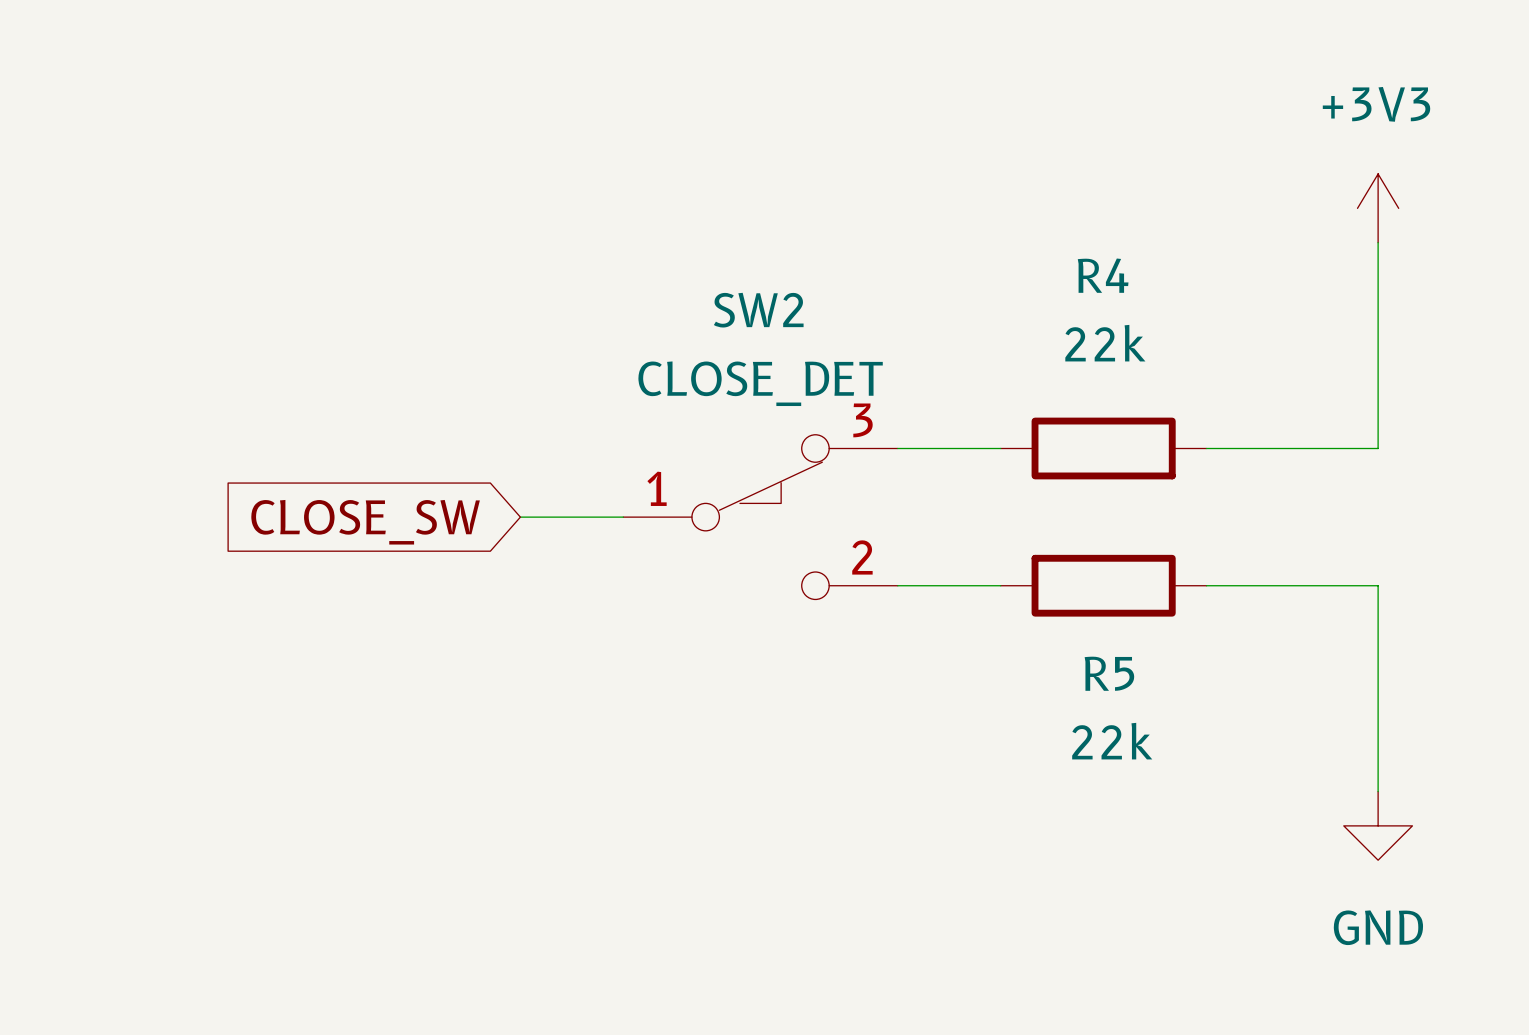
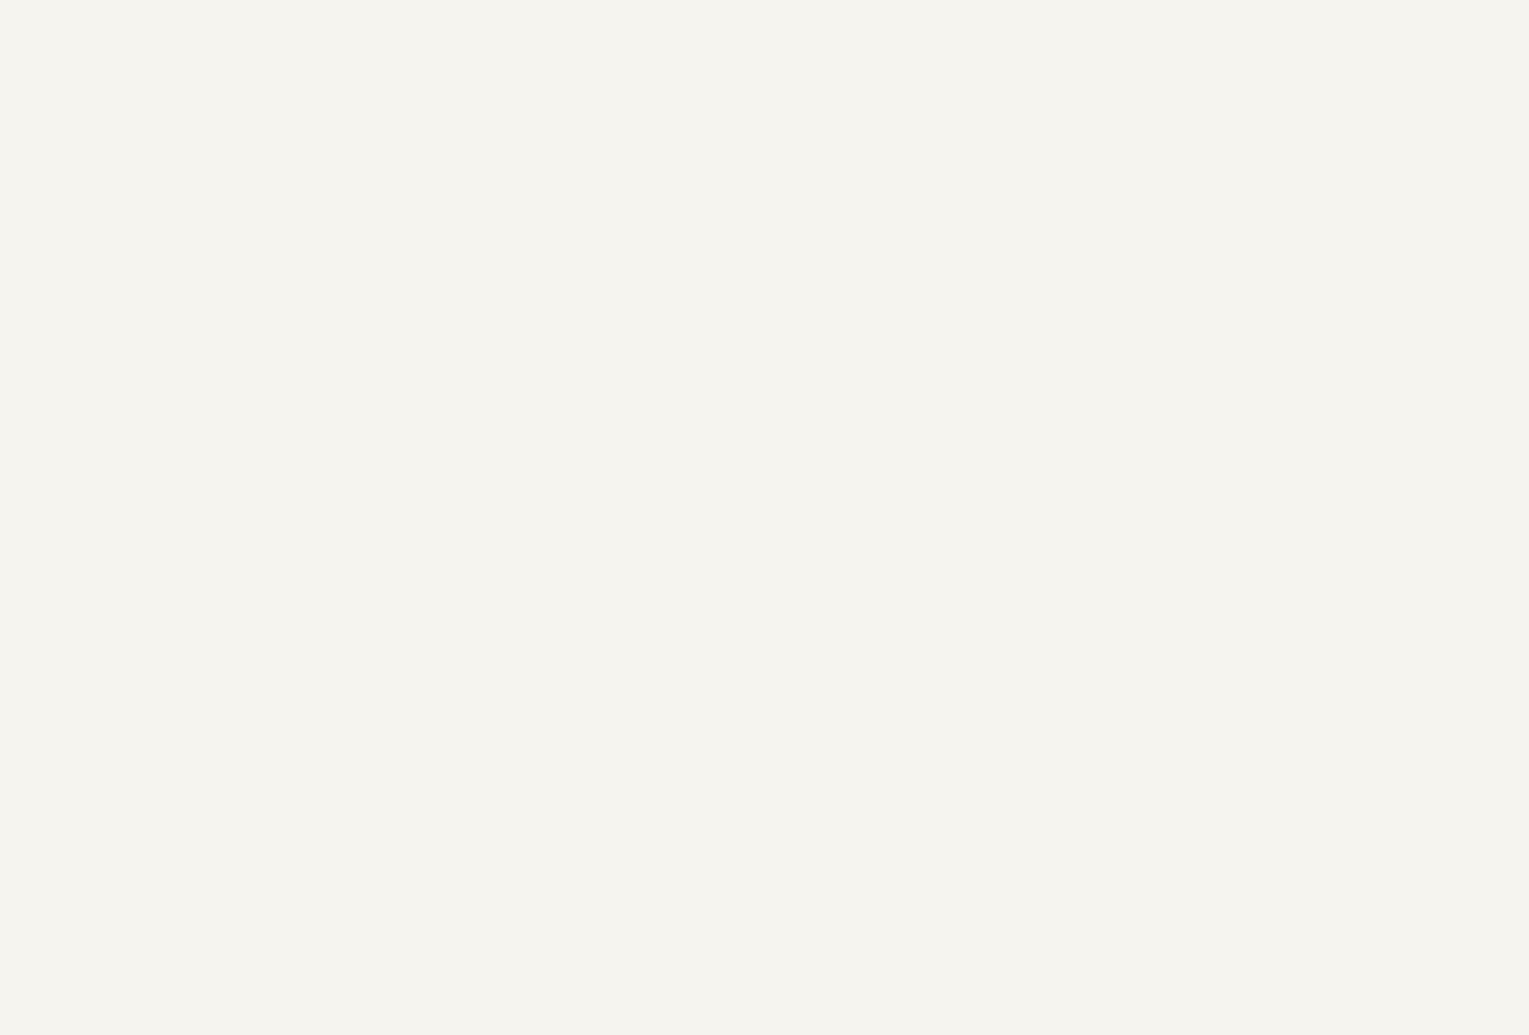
power symbol: +3V3 (1378, 208) -> none
wire: (1378, 242) (1378, 448) (1206, 448) -> none
wire: (897, 448) (1000, 448) -> none
R4: 22k (1103, 448) -> none
wire: (520, 517) (623, 517) -> none
SW2: CLOSE_DET (760, 517) -> none
global label: CLOSE_SW (365, 522) -> none
wire: (897, 585) (1000, 585) -> none
R5: 22k (1103, 585) -> none
wire: (1206, 585) (1378, 585) (1378, 791) -> none
power symbol: GND (1378, 825) -> none

